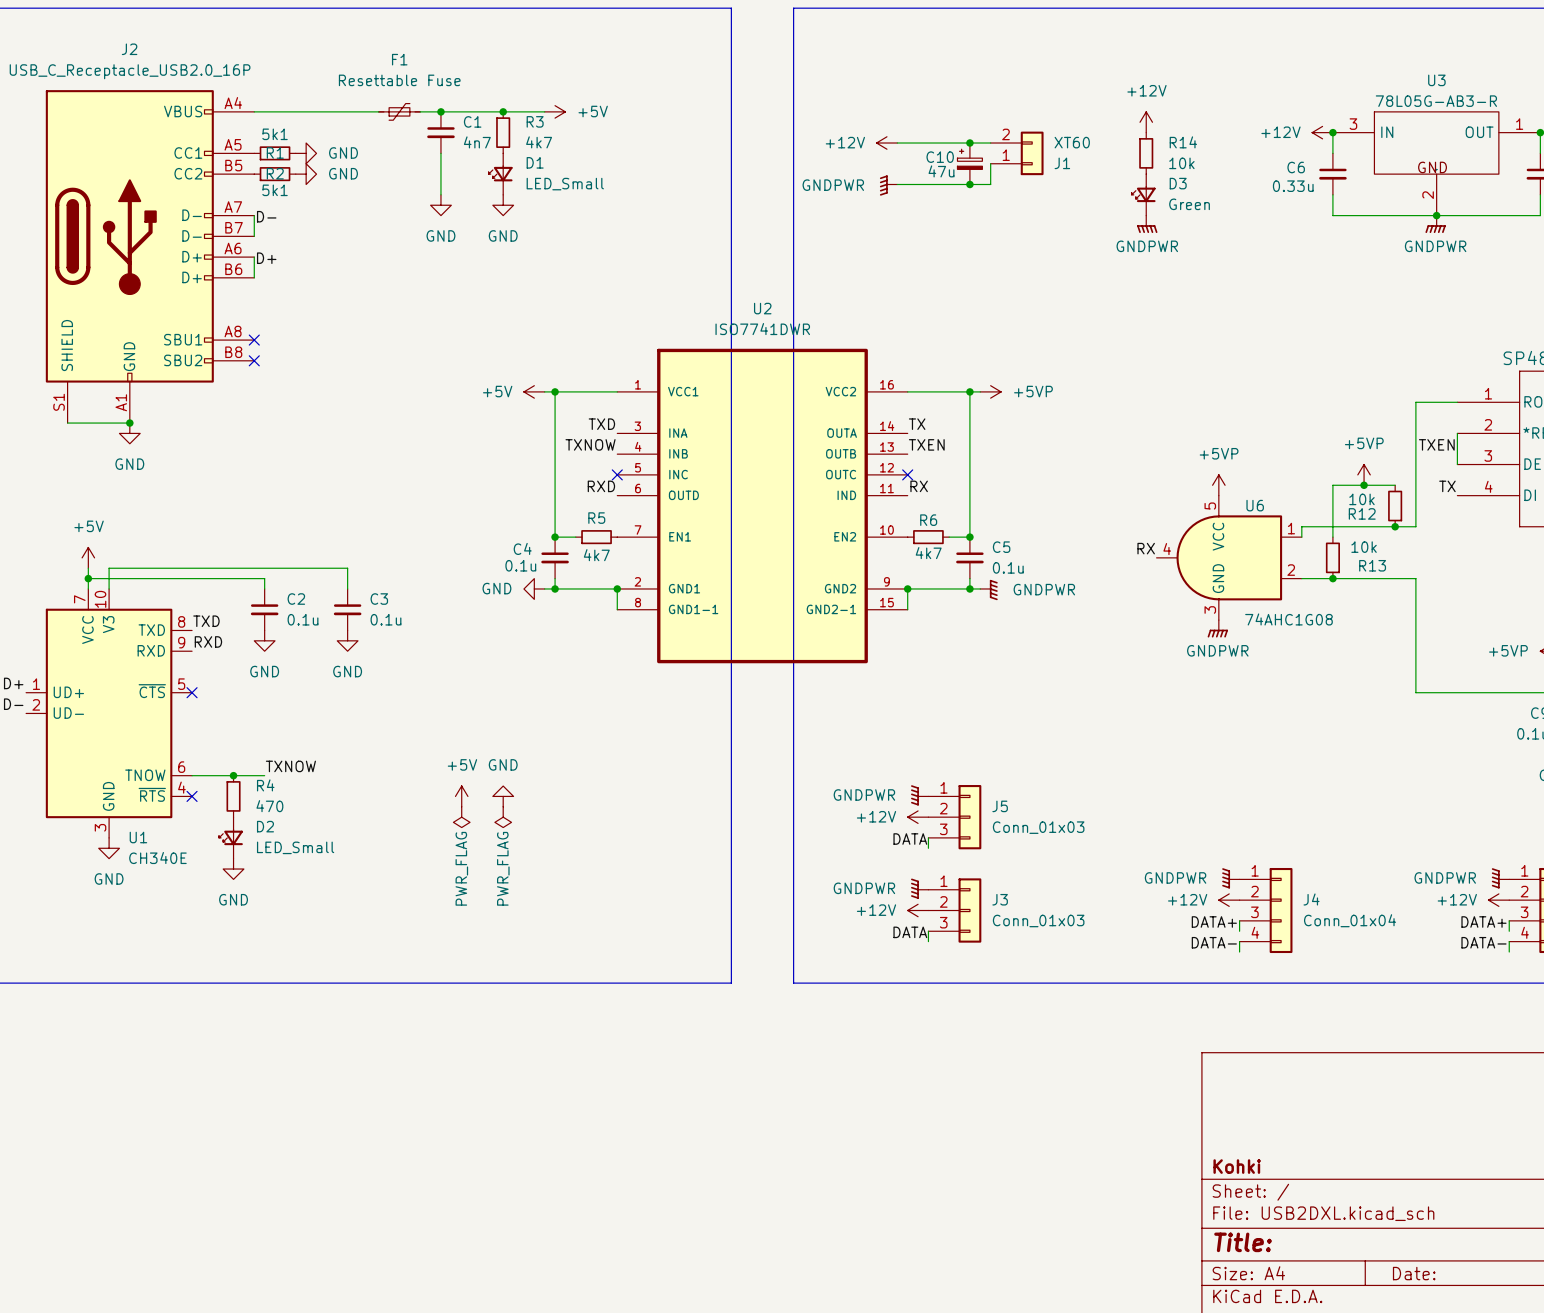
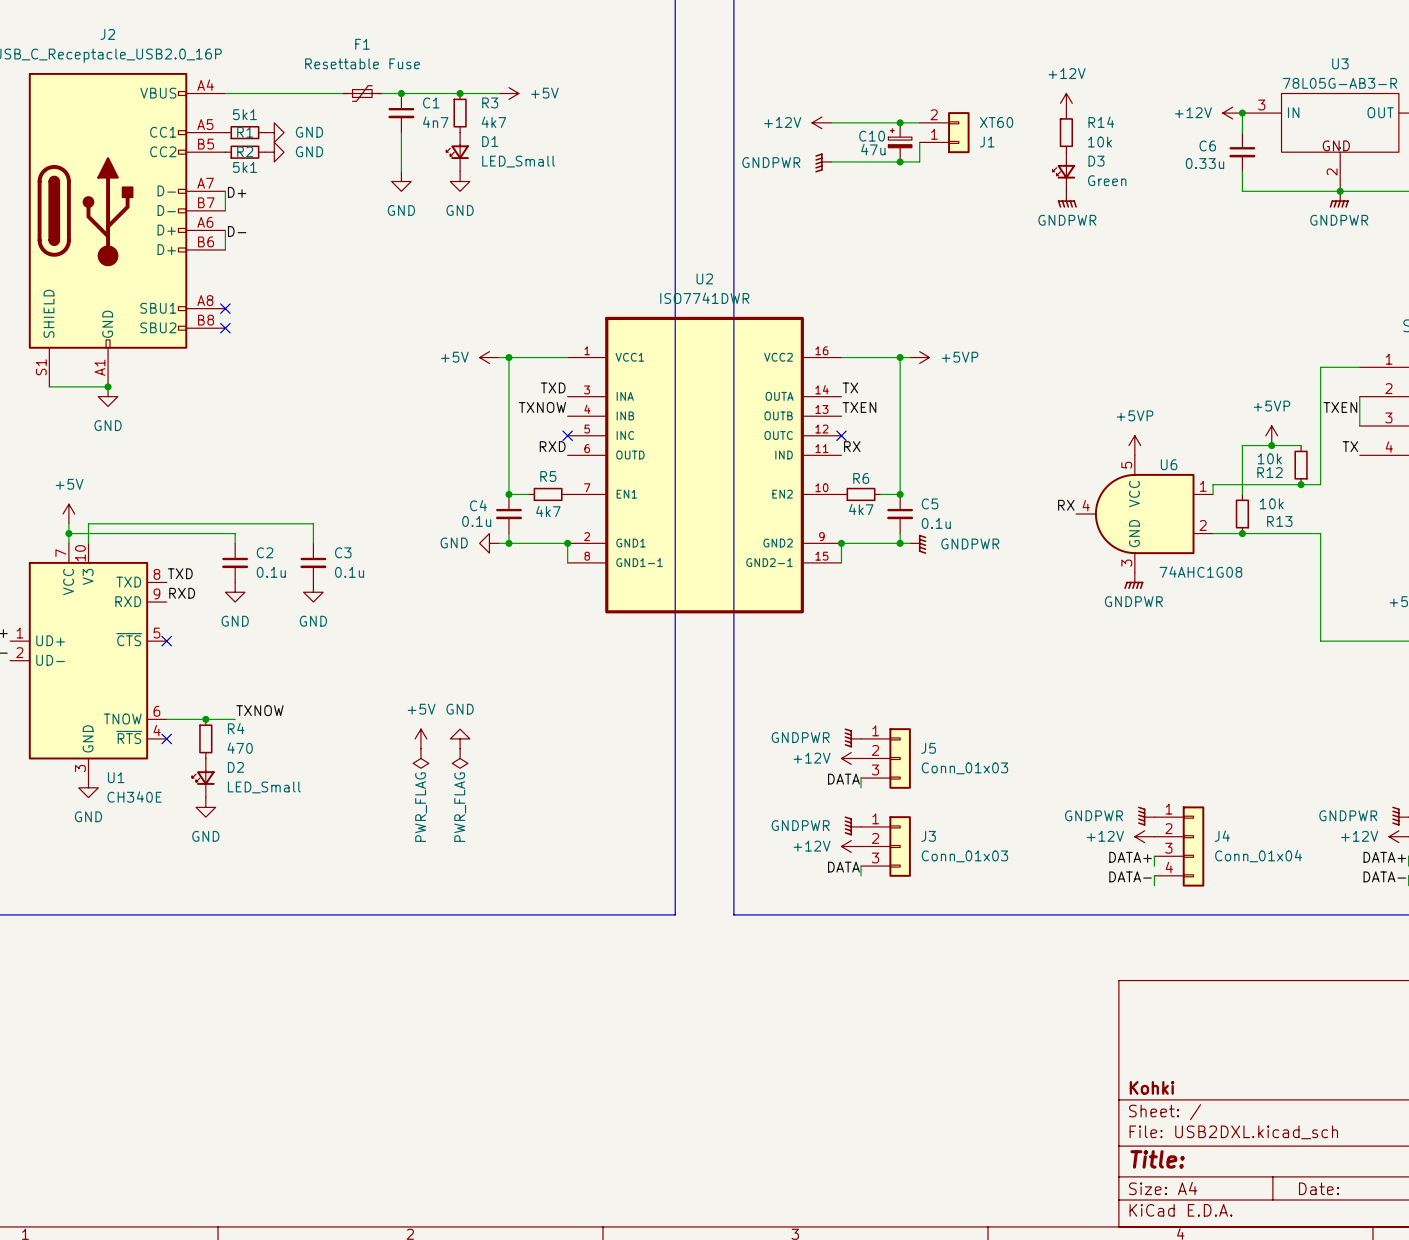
label: D- (266, 216) -> D+ (237, 192)
label: D+ (266, 258) -> D- (237, 231)

